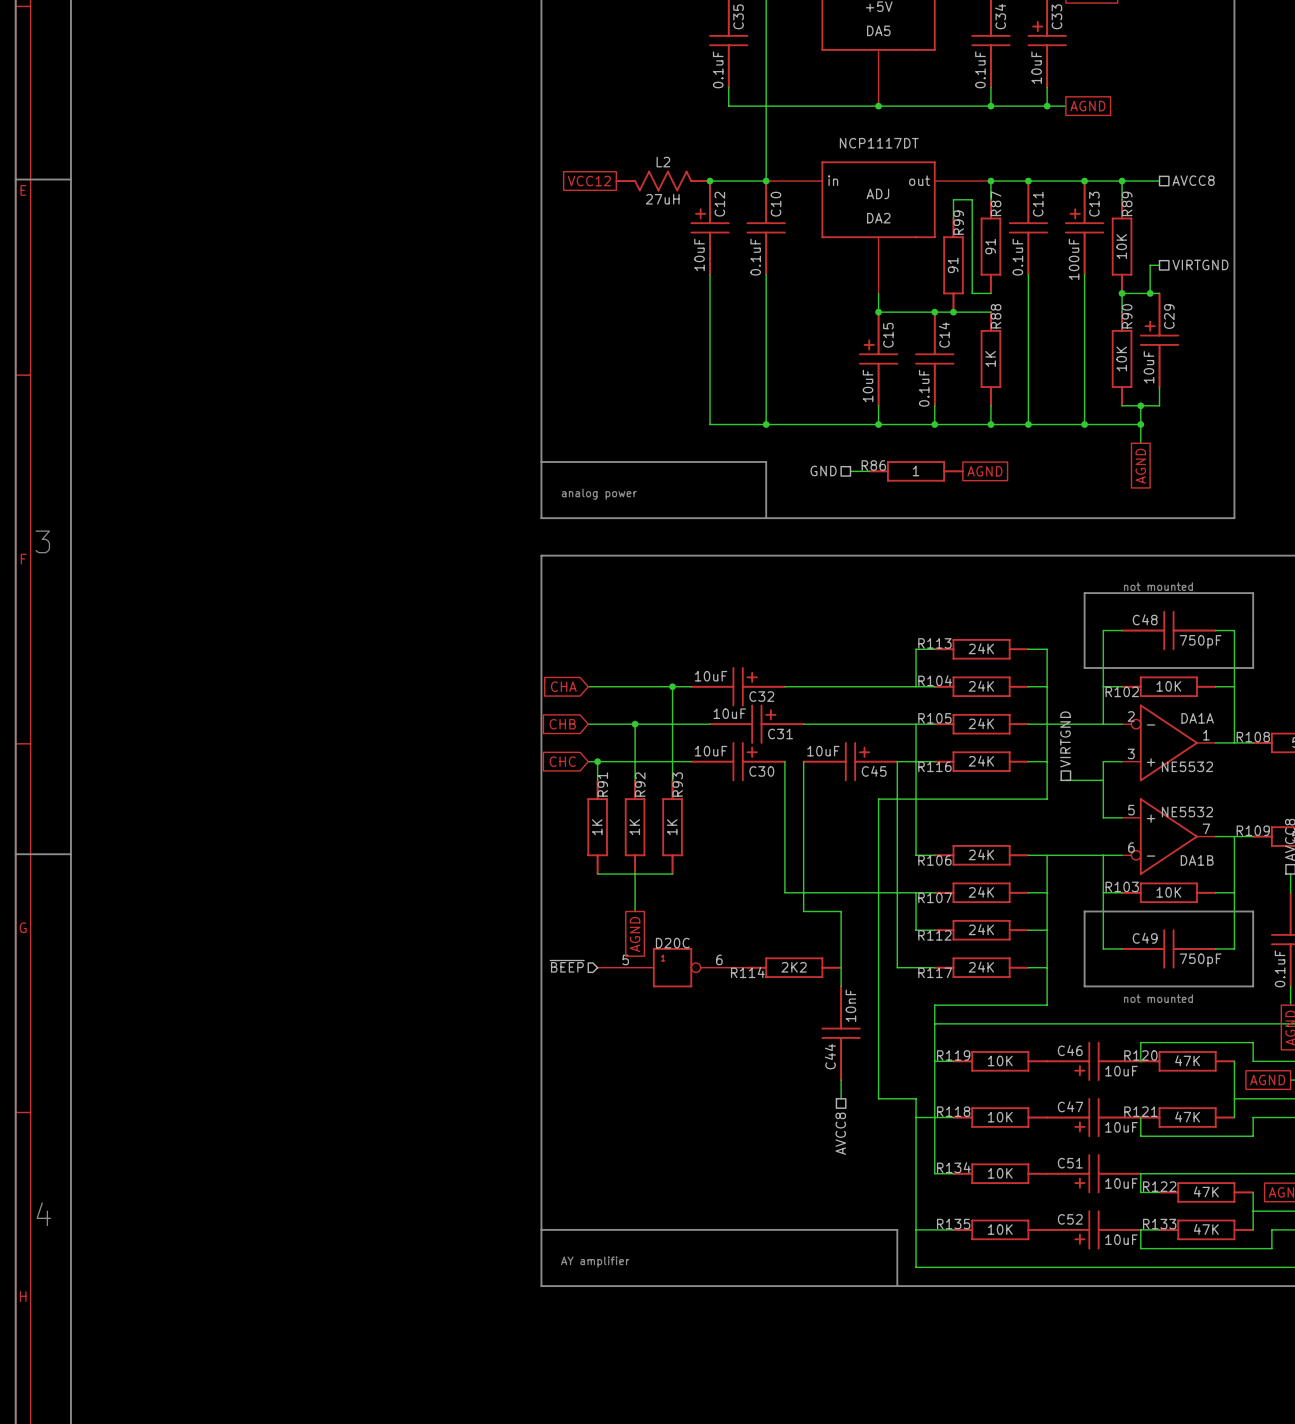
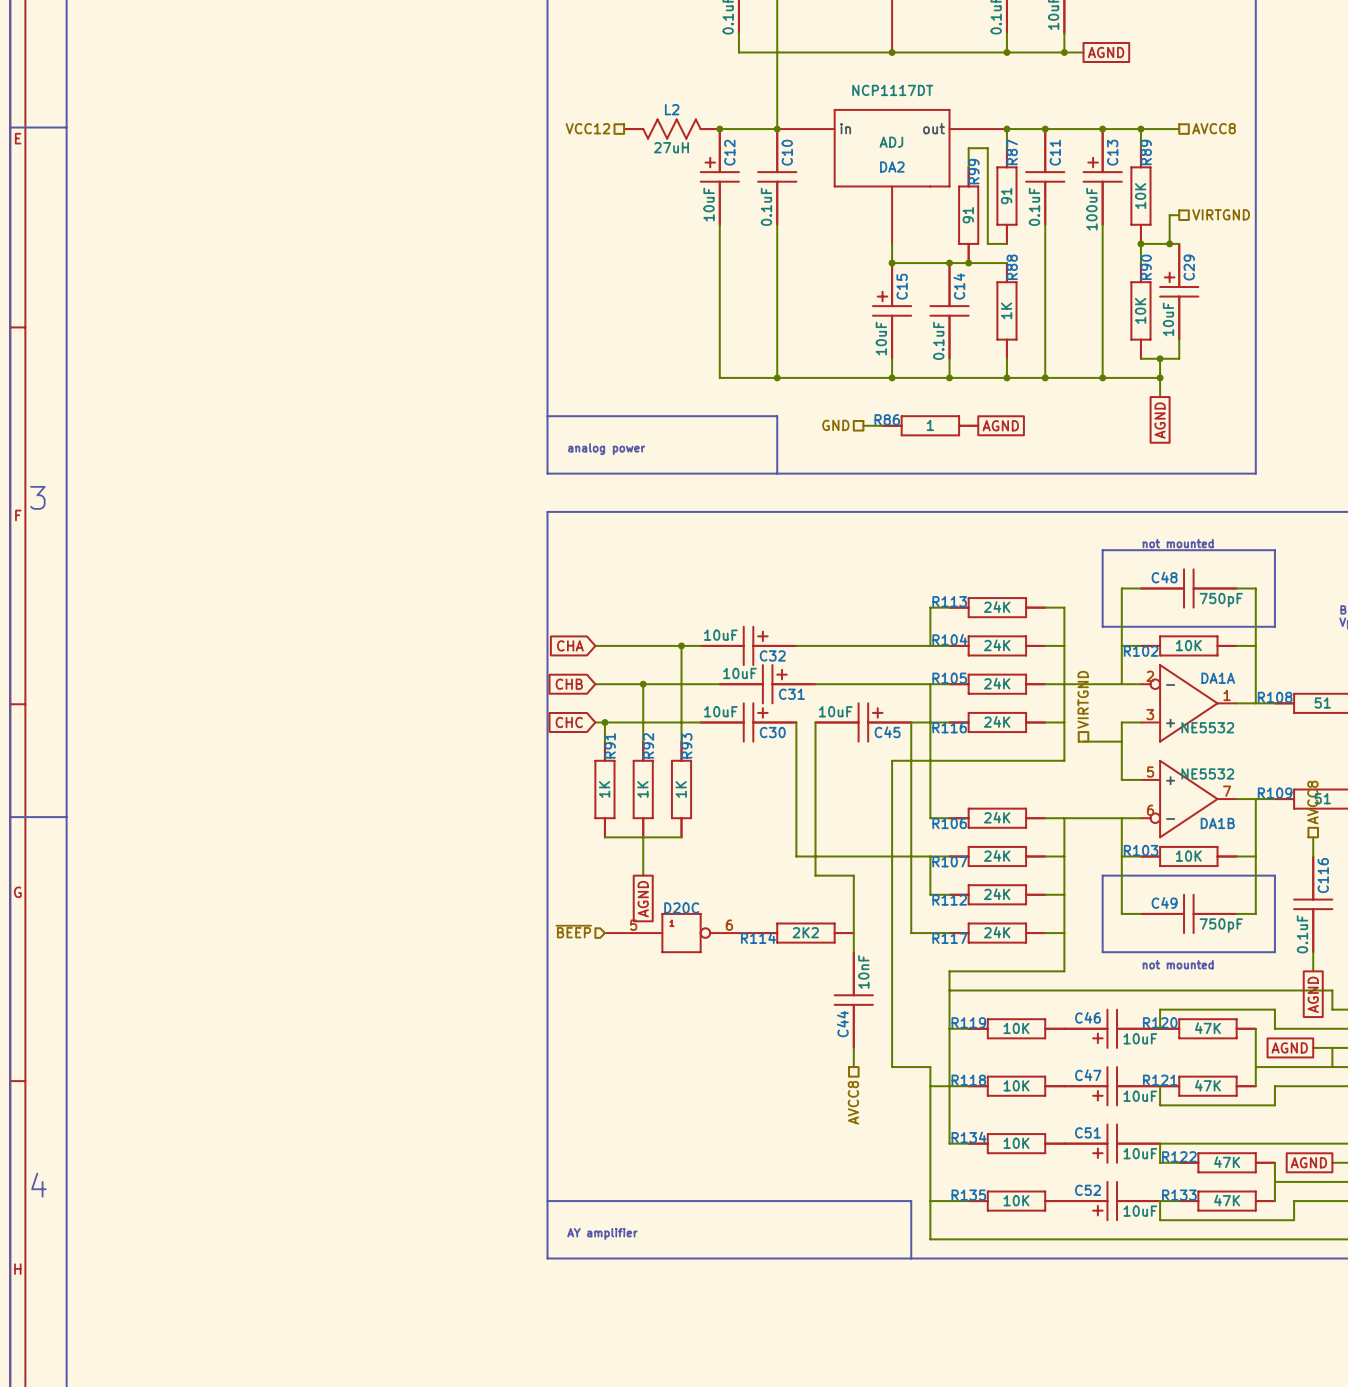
hierarchical label: none -> VCC12 (587, 128)
global label: VCC12 (589, 181) -> none

